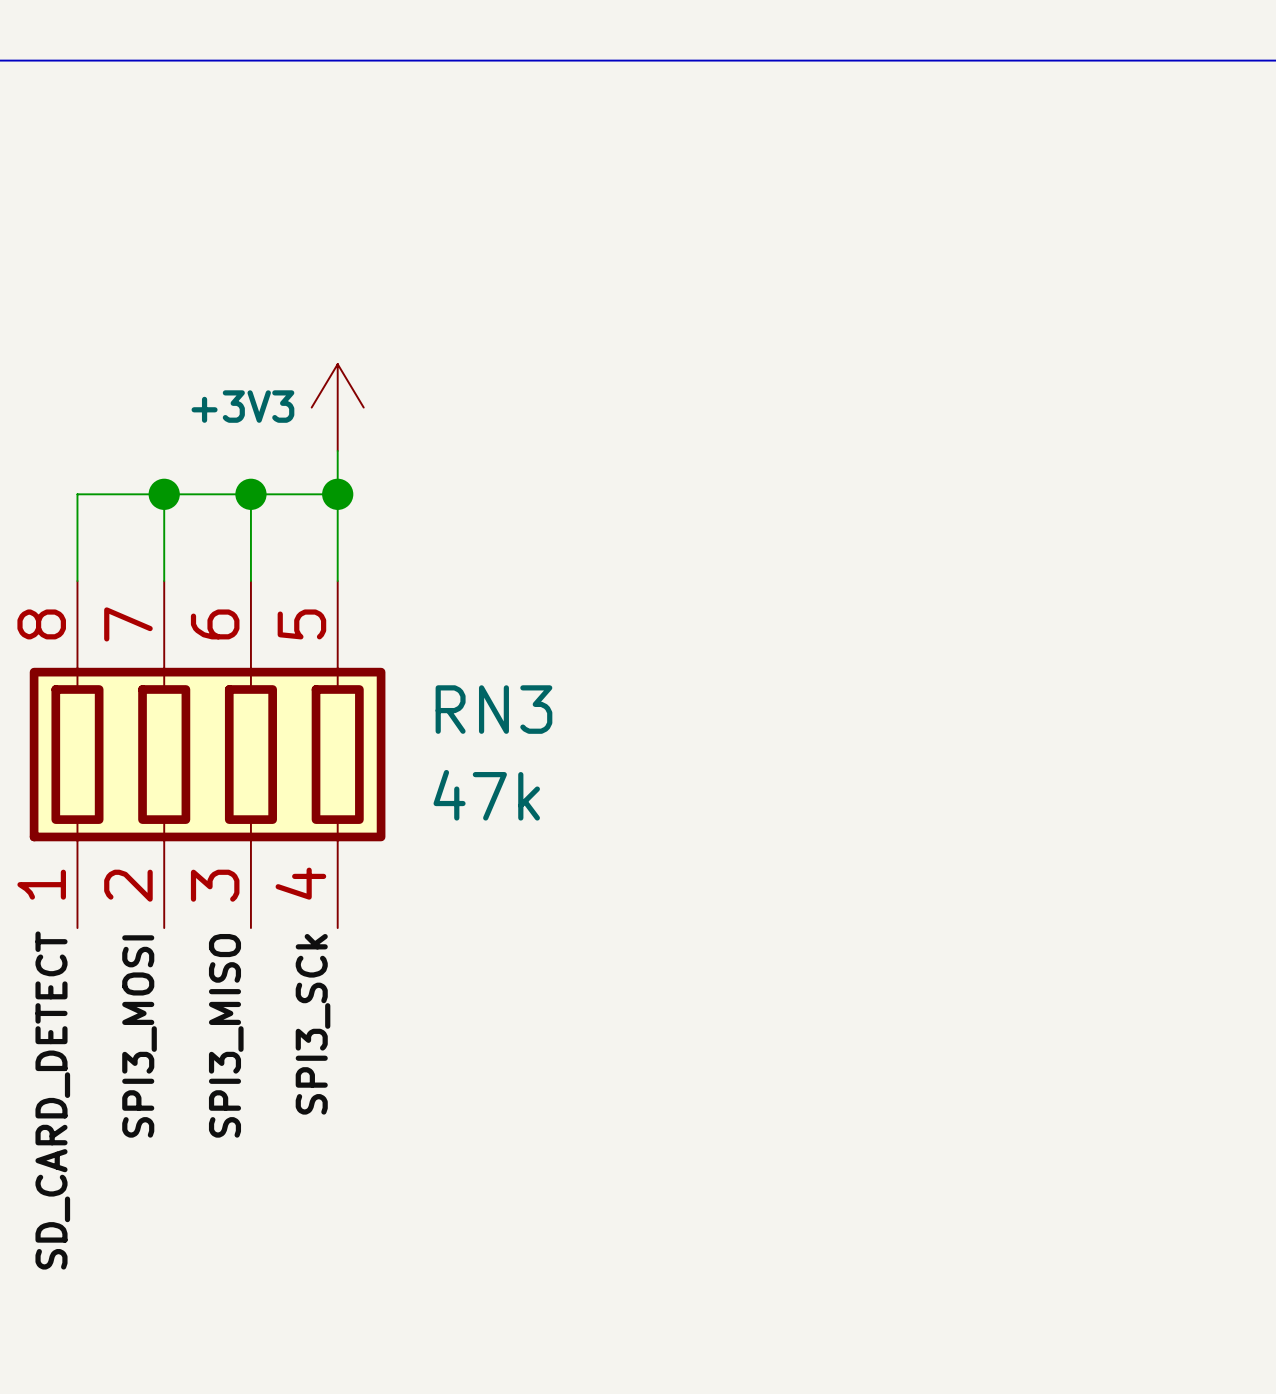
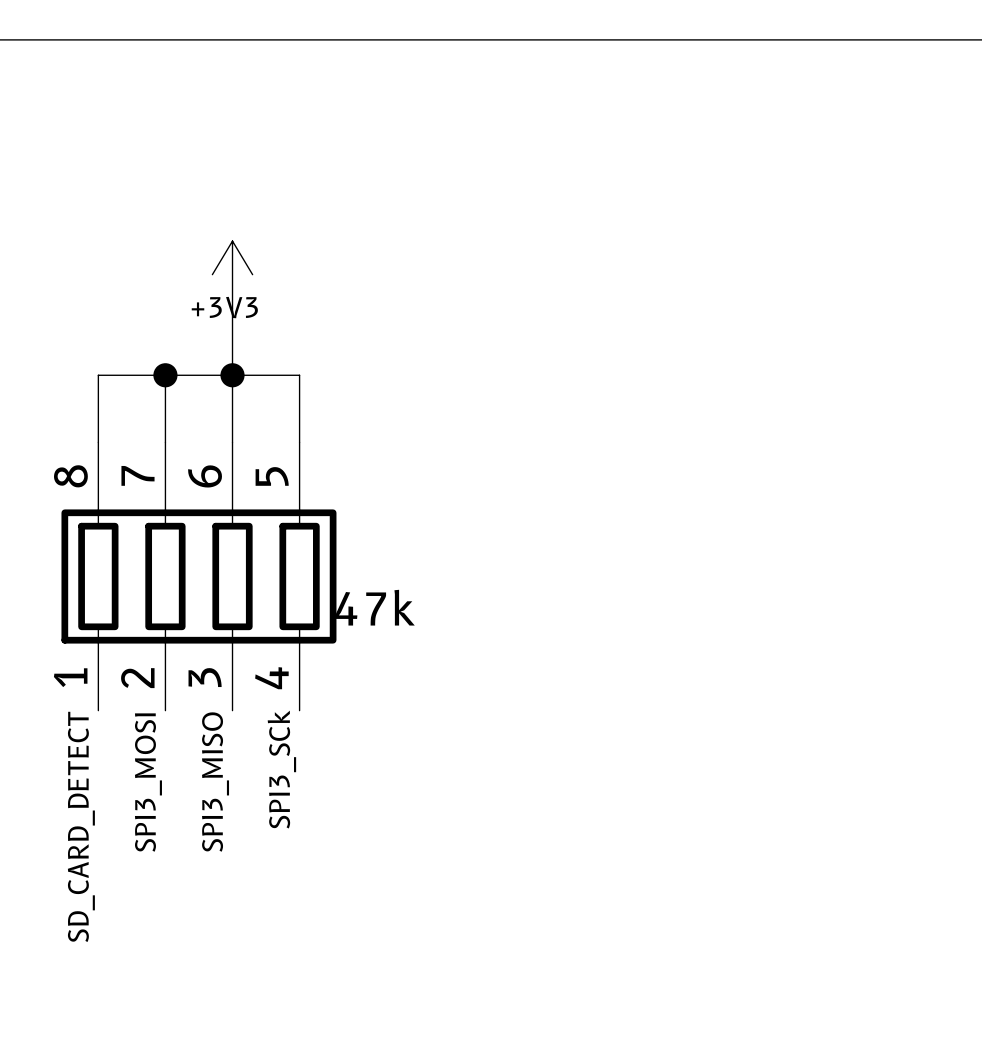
wire: none -> (232, 308) (232, 375)
power symbol position: +3V3 (337, 407) -> +3V3 (232, 274)
wire: (337, 450) (337, 494) -> none
junction: (337, 494) -> none
RN3 name: RN3 (493, 709) -> none
RN3 value position: 47k (486, 795) -> 47k (375, 607)

